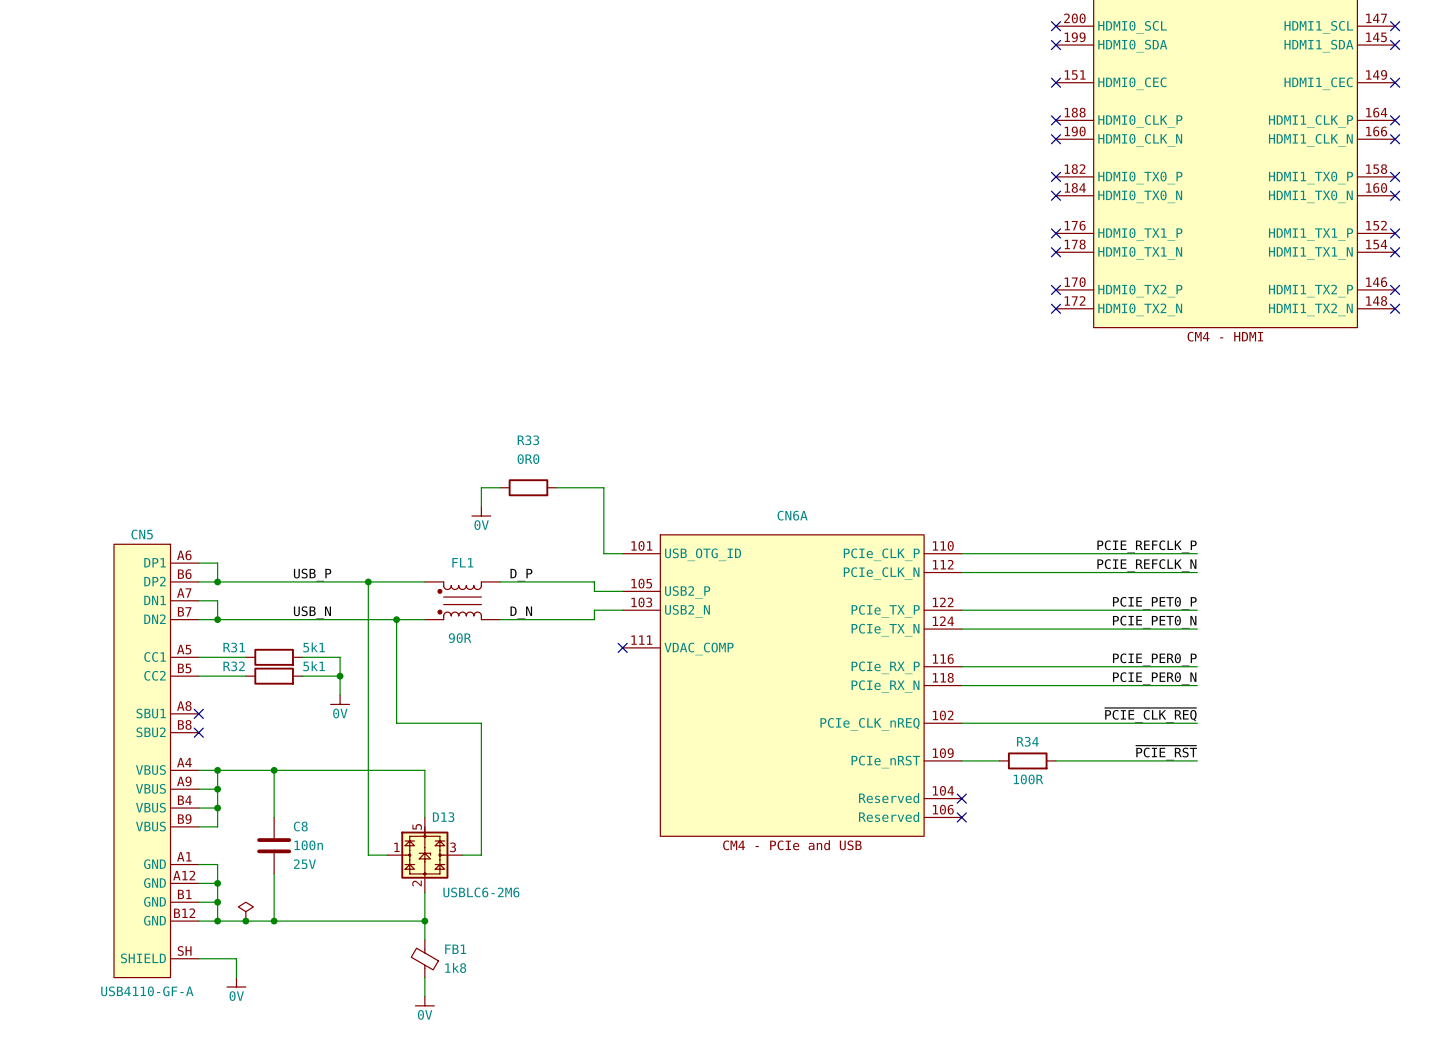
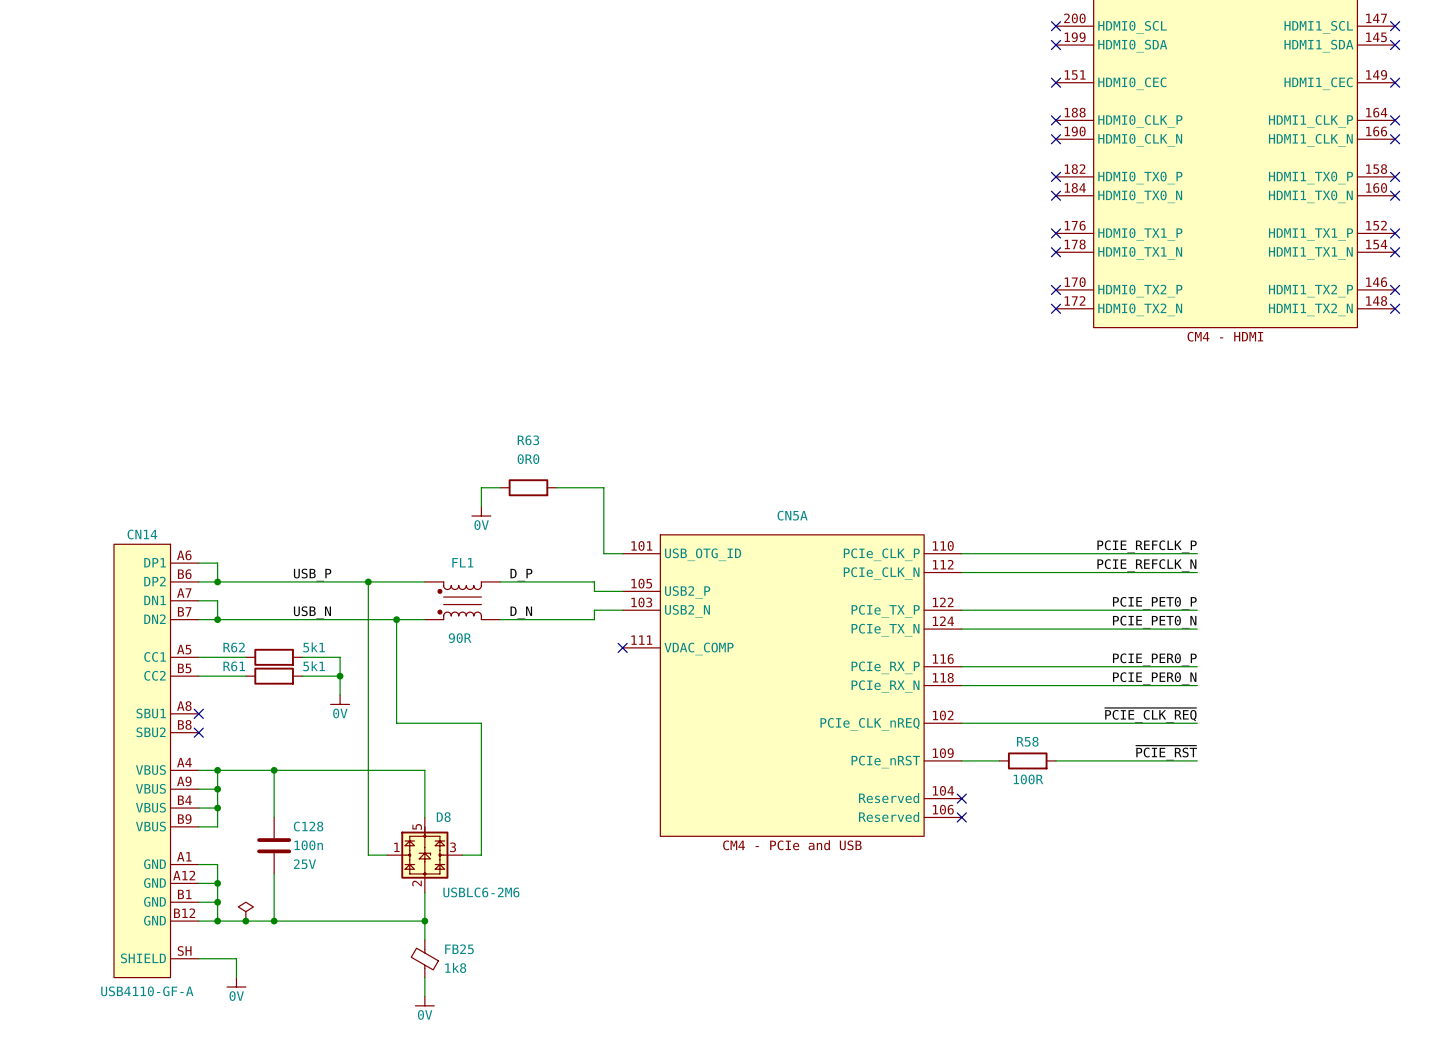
R33 name: R33 (528, 440) -> R63 (528, 440)
CN6A name: CN6A (792, 515) -> CN5A (792, 515)
CN5 name: CN5 (142, 534) -> CN14 (142, 534)
R31 name: R31 (234, 647) -> R62 (234, 647)
R32 name: R32 (234, 666) -> R61 (234, 666)
R34 name: R34 (1027, 741) -> R58 (1027, 741)
D13 name: D13 (443, 817) -> D8 (443, 817)
C8 name: C8 (300, 826) -> C128 (308, 826)
FB1 name: FB1 (455, 949) -> FB25 (459, 949)

